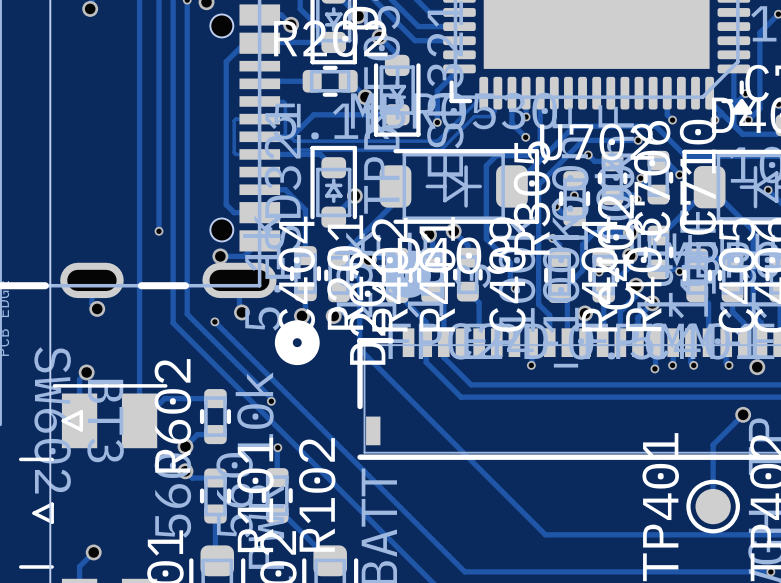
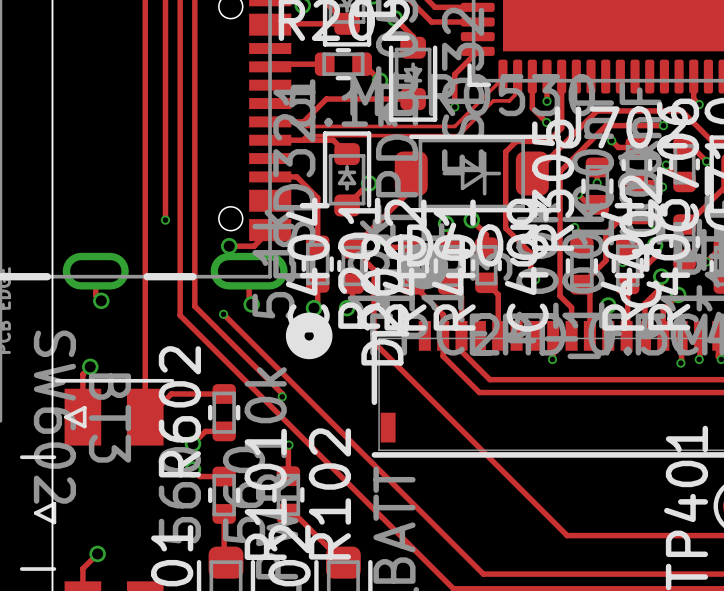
track: (259, 43) (244, 43) (226, 61) (226, 204) (234, 212) (259, 212) -> none
track: (259, 101) (283, 101) (285, 103) (285, 135) (283, 136) -> none
track: (259, 119) (235, 119) (234, 120) (234, 152) (235, 154) (259, 154) -> none

